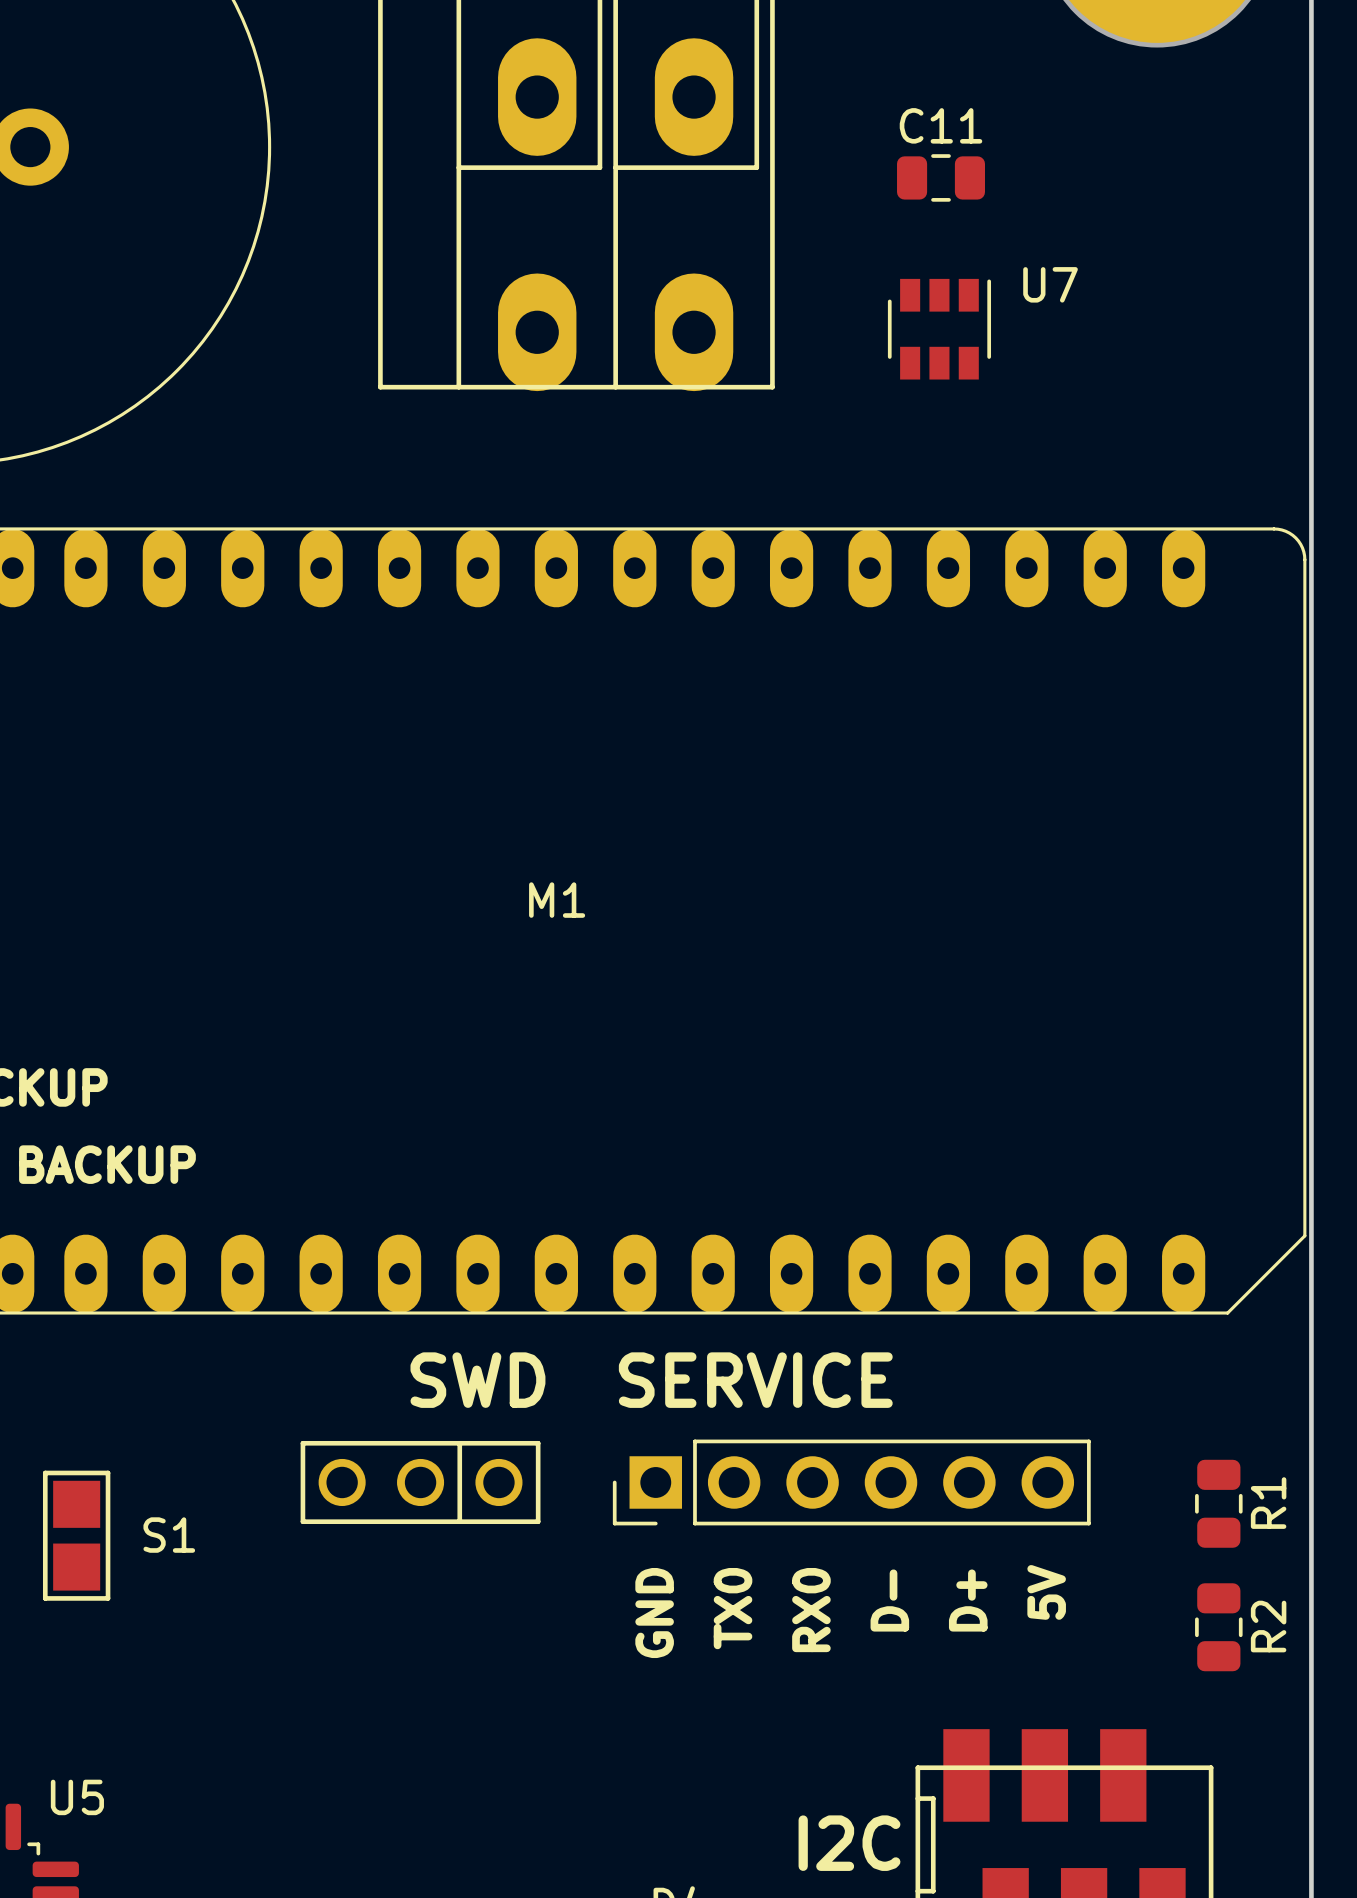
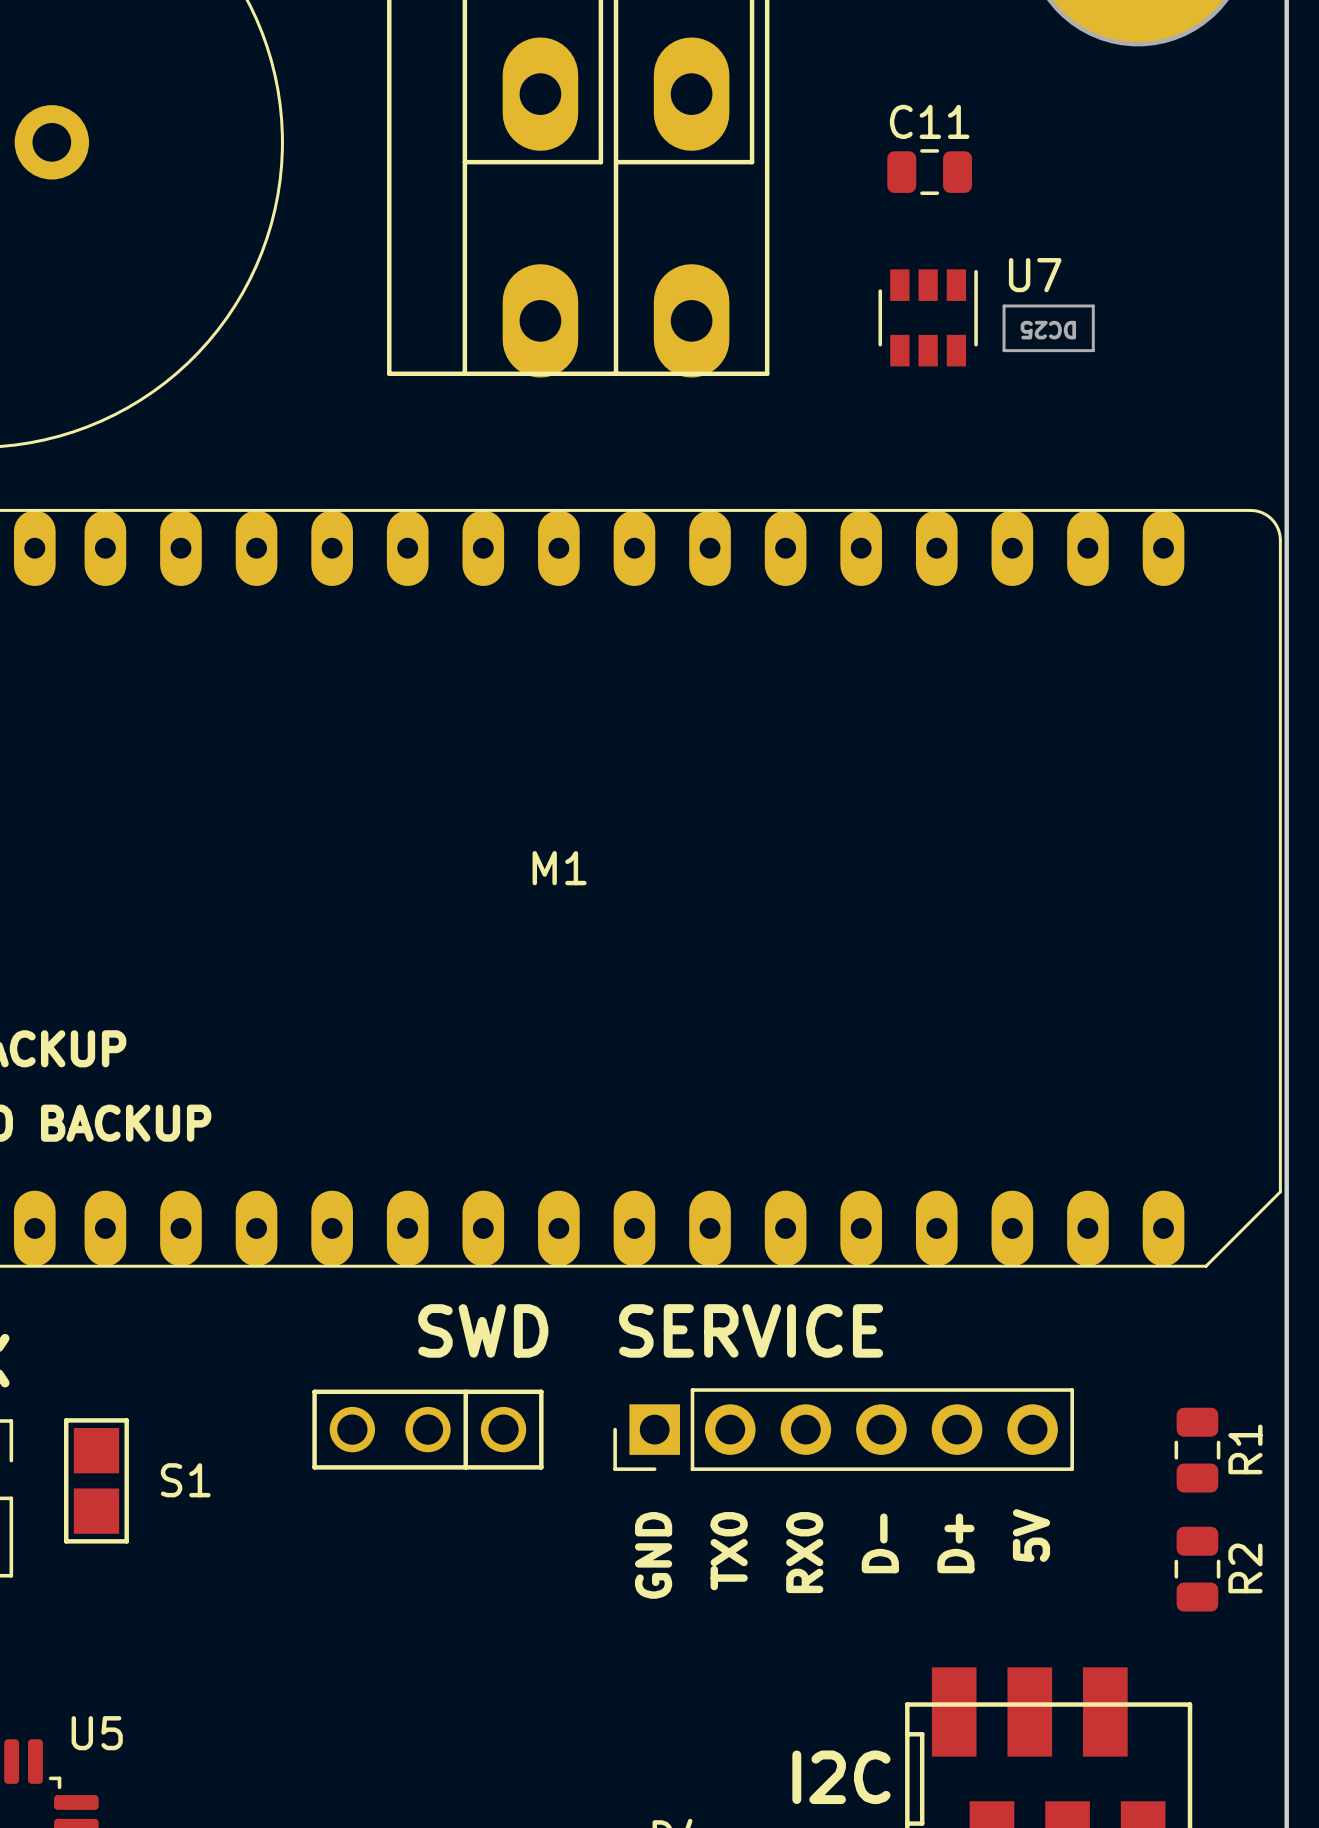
line: none -> (1004, 305) (1004, 350) (1093, 350) (1093, 305) (1004, 305)
text: none -> DC25 (1048, 330)

